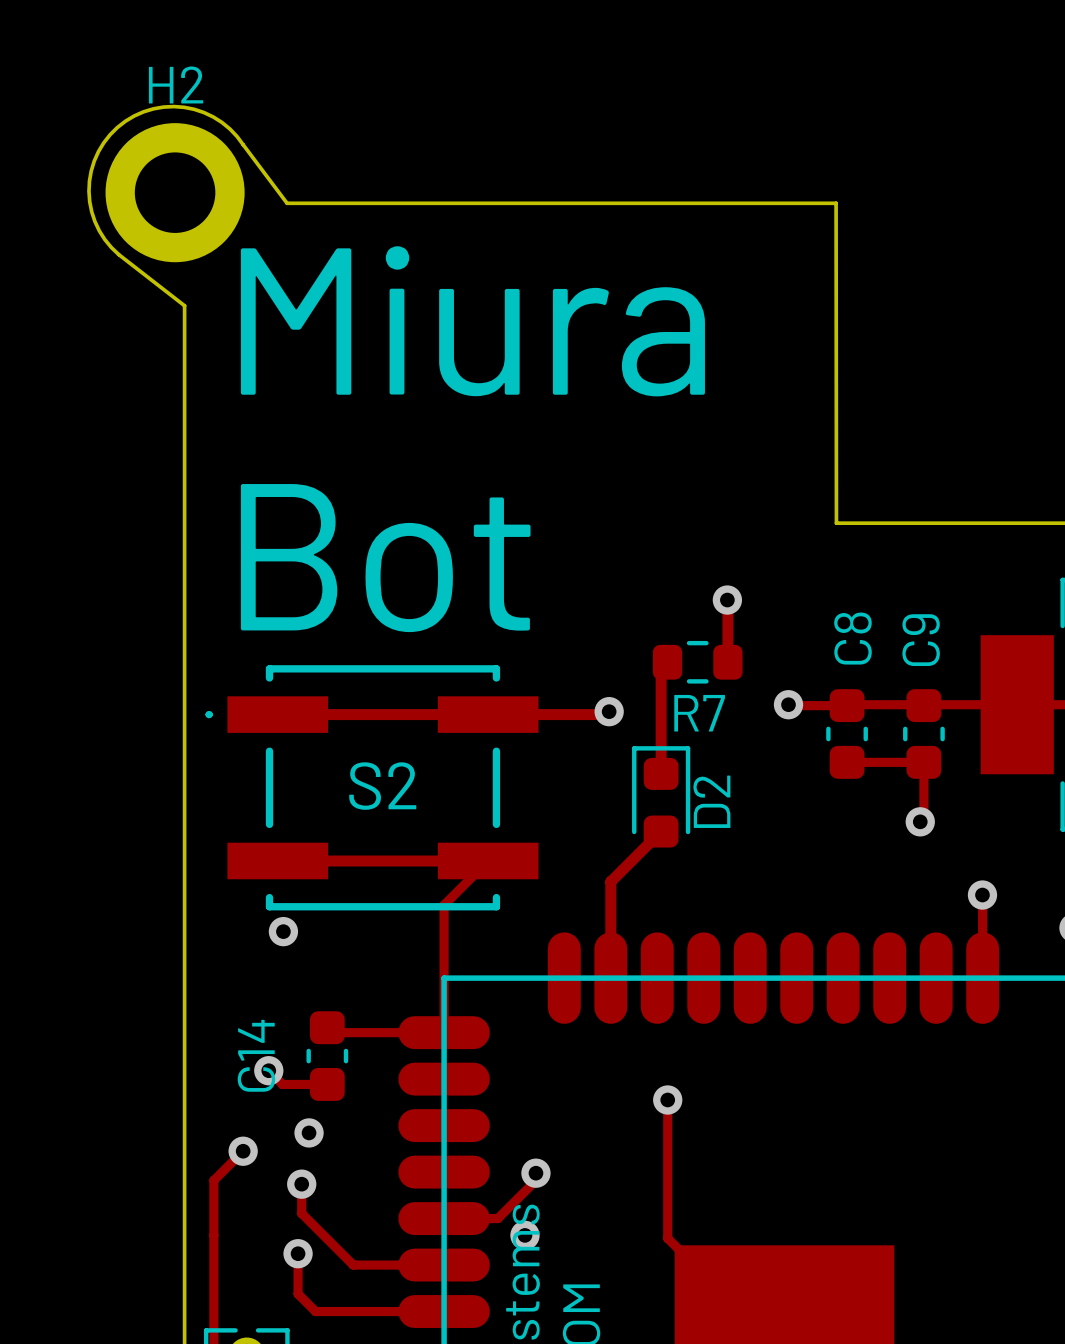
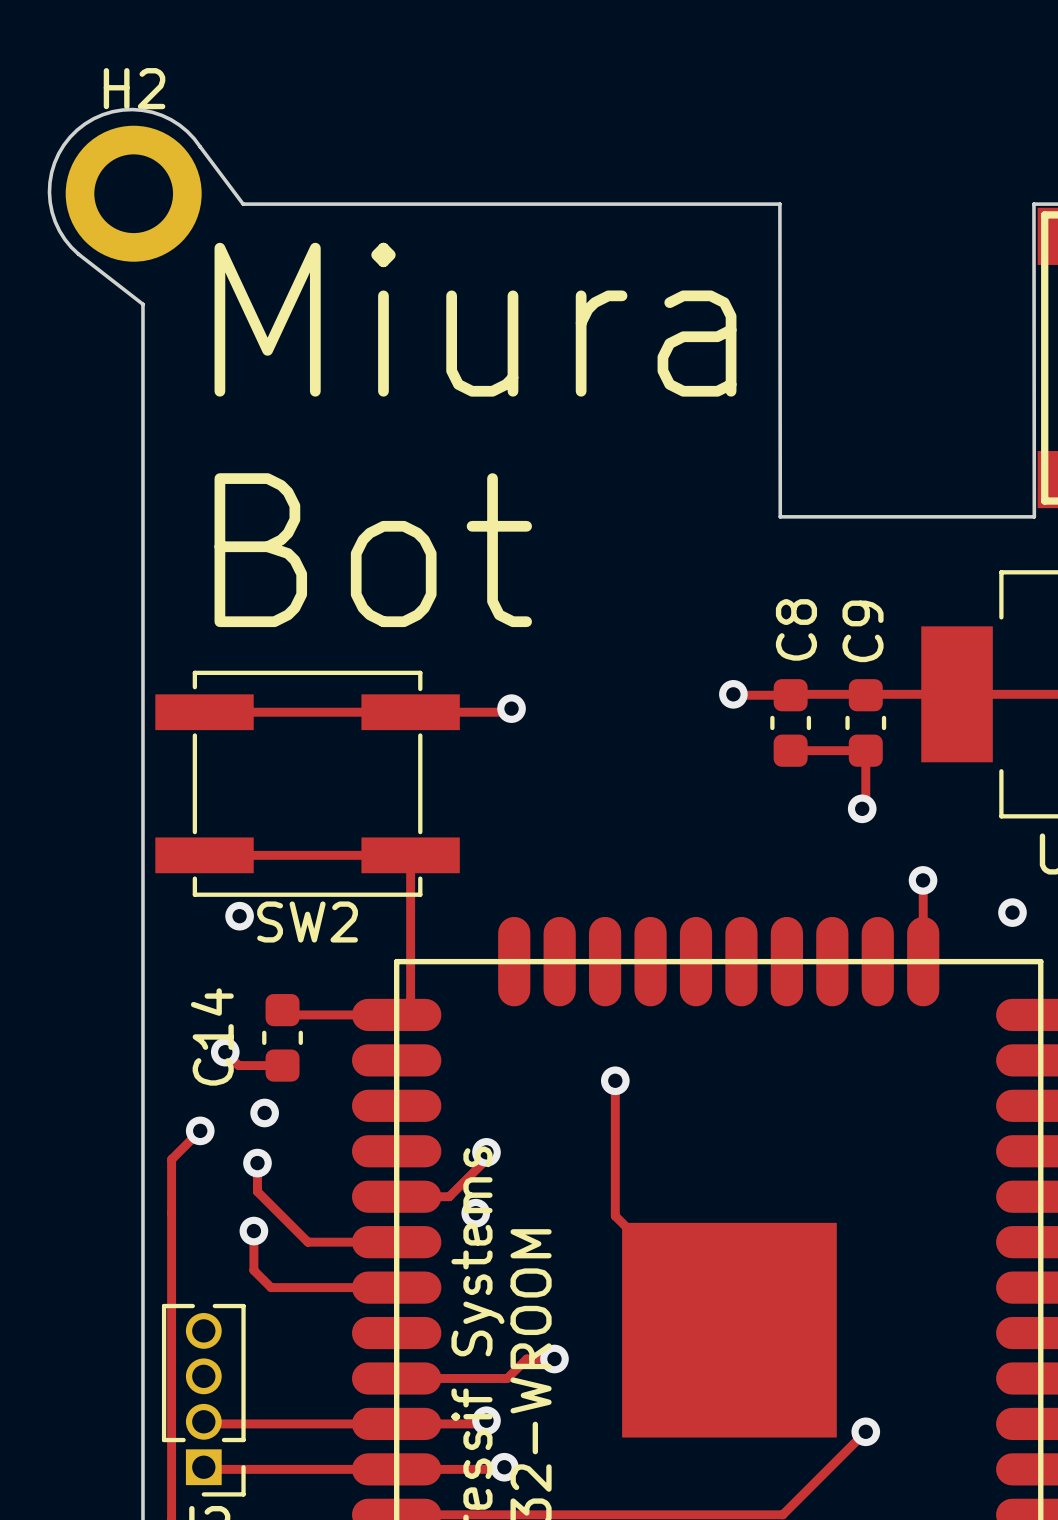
track: (727, 600) (727, 662) -> none
via: (727, 600) -> none
track: (667, 662) (661, 668) (661, 773) -> none
R7: (697, 662) -> none
track: (609, 711) (606, 714) (277, 714) -> none
via position: (609, 711) -> (511, 708)
track: none -> (511, 708) (507, 712) (204, 712)
S2: (371, 787) -> none
SW2: none -> (307, 783)
D2: (661, 796) -> none
track: (661, 831) (610, 881) (610, 978) -> none
track: (277, 860) (488, 860) (444, 905) (444, 1032) -> (204, 855) (410, 855) (410, 1000) (396, 1014)

